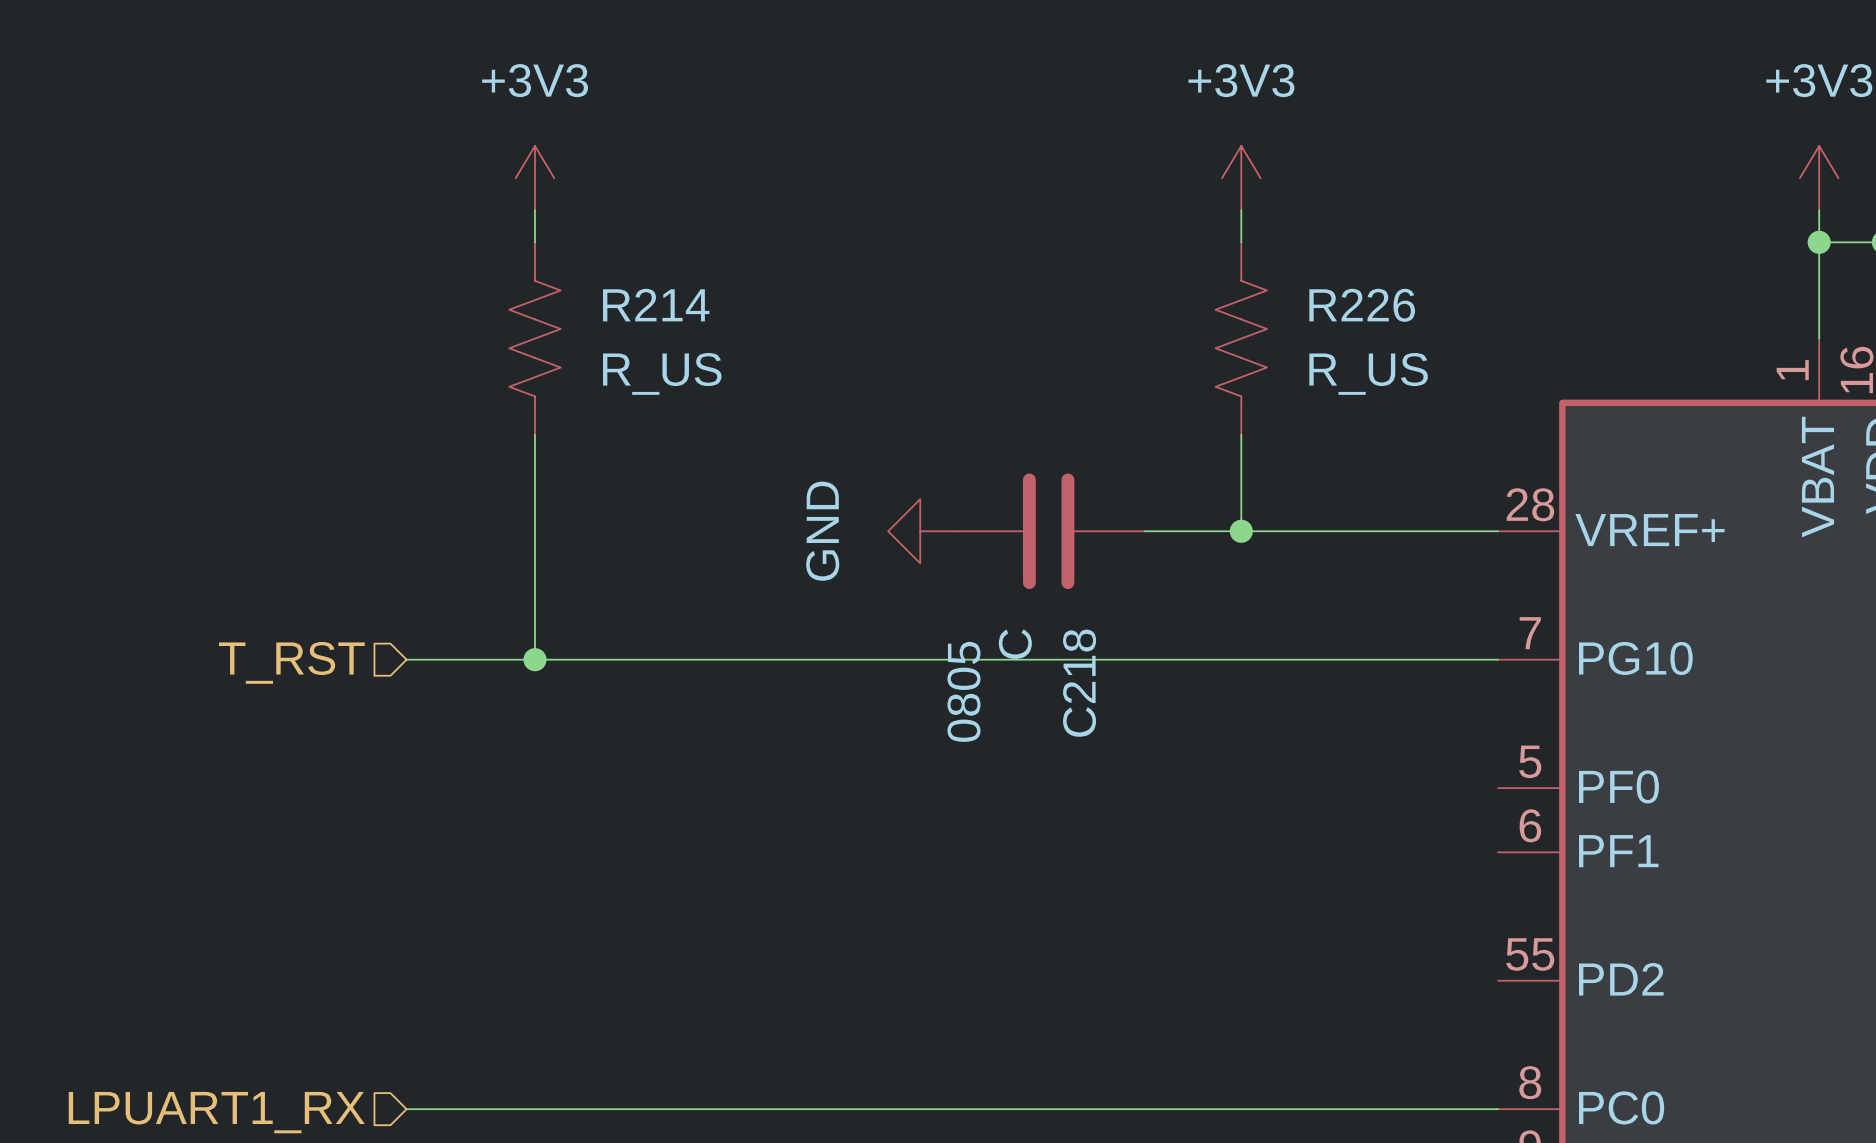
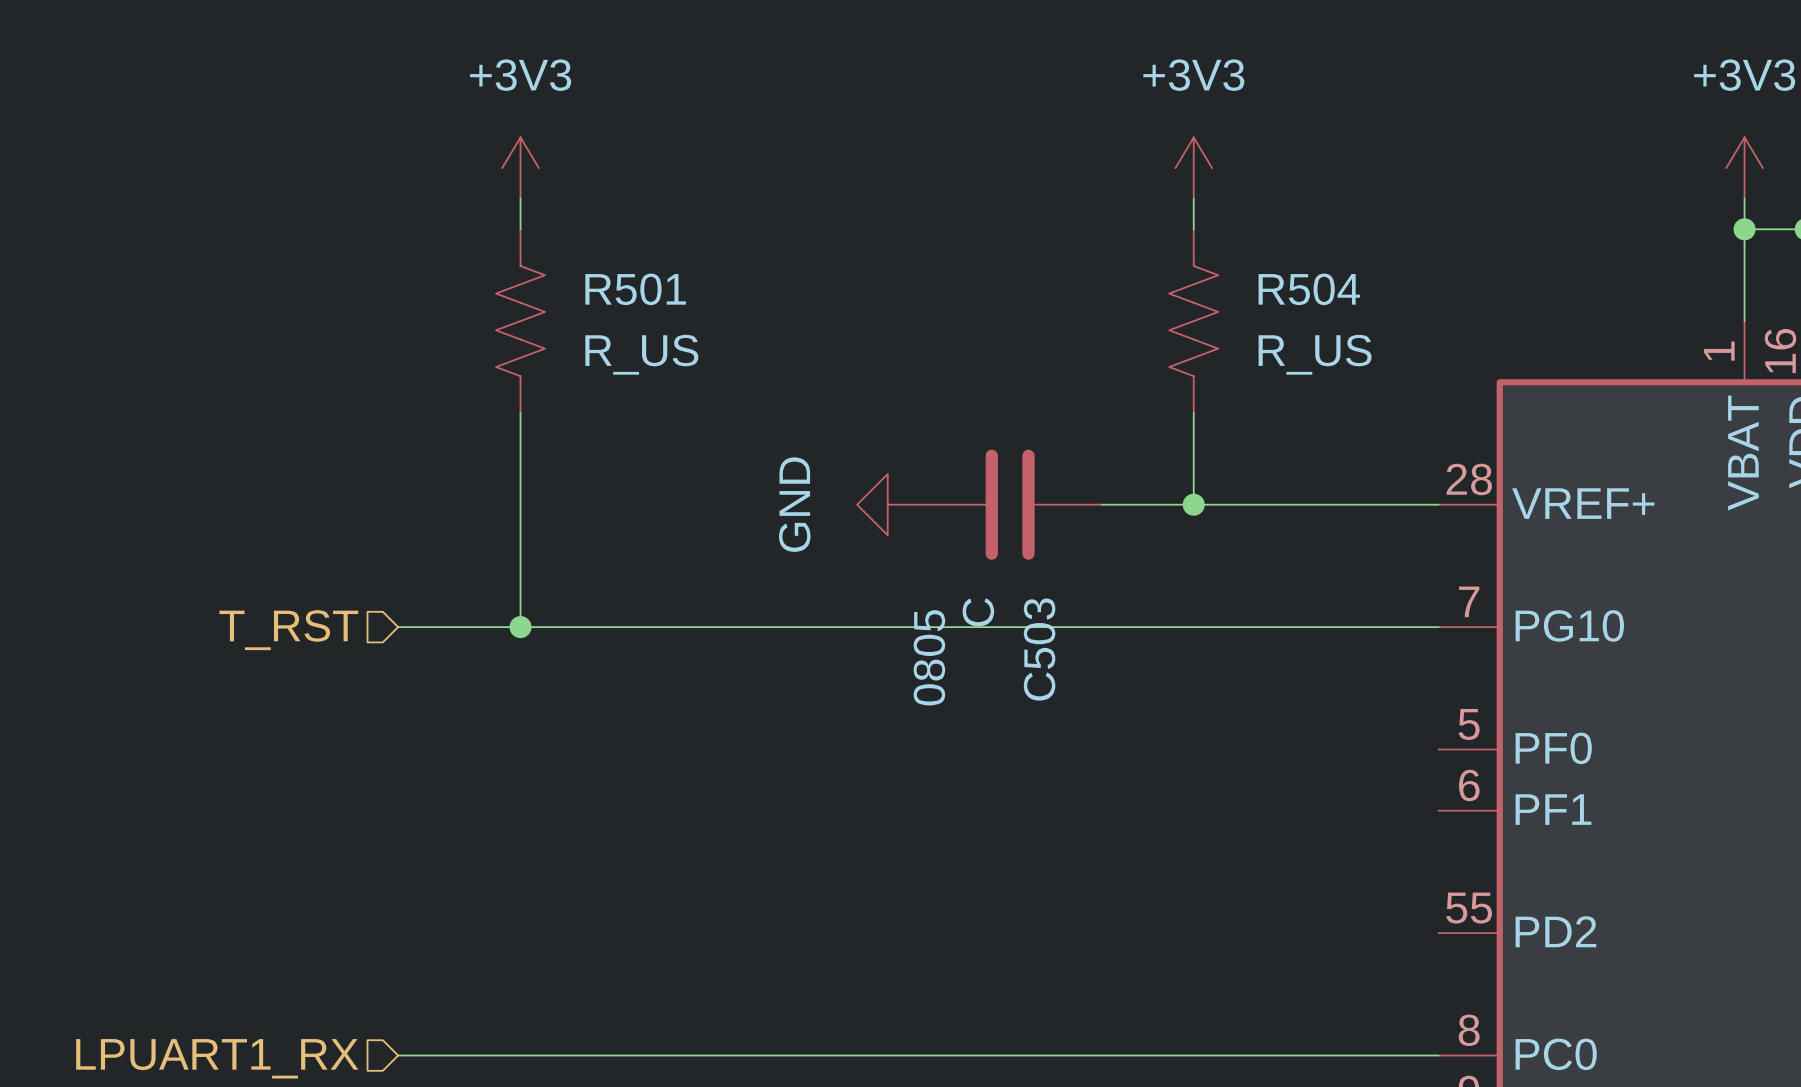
R214 name: R214 (656, 305) -> R501 (635, 289)
R226 name: R226 (1362, 305) -> R504 (1309, 289)
C218 name: C218 (1079, 683) -> C503 (1039, 649)

